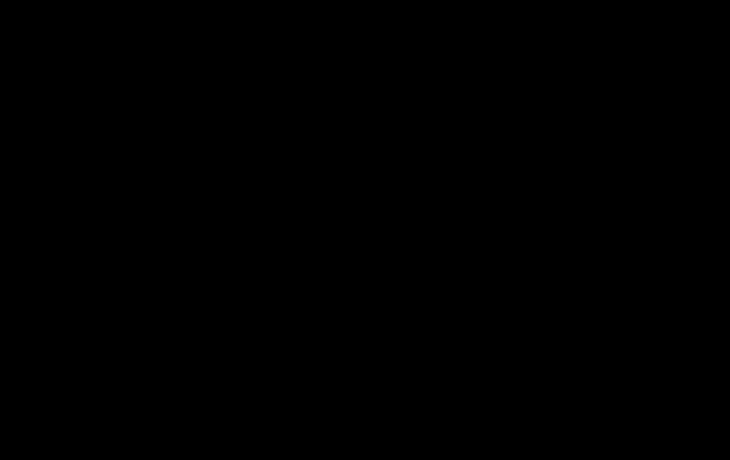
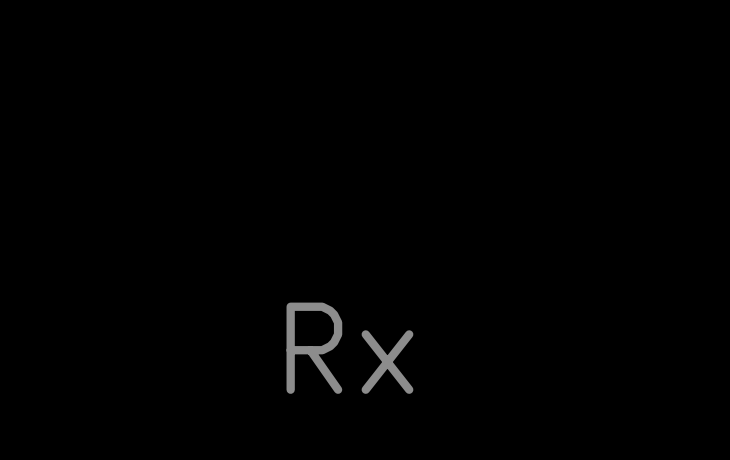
text: none -> Rx (349, 348)

